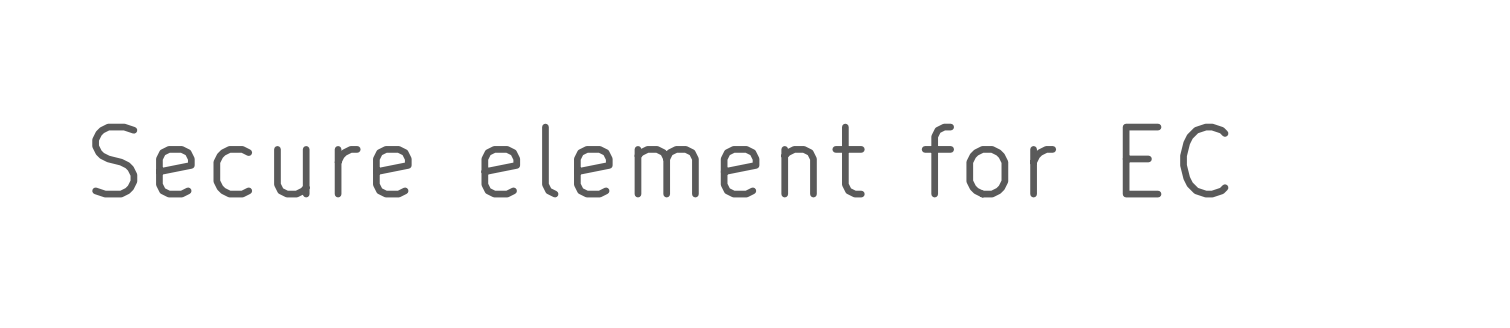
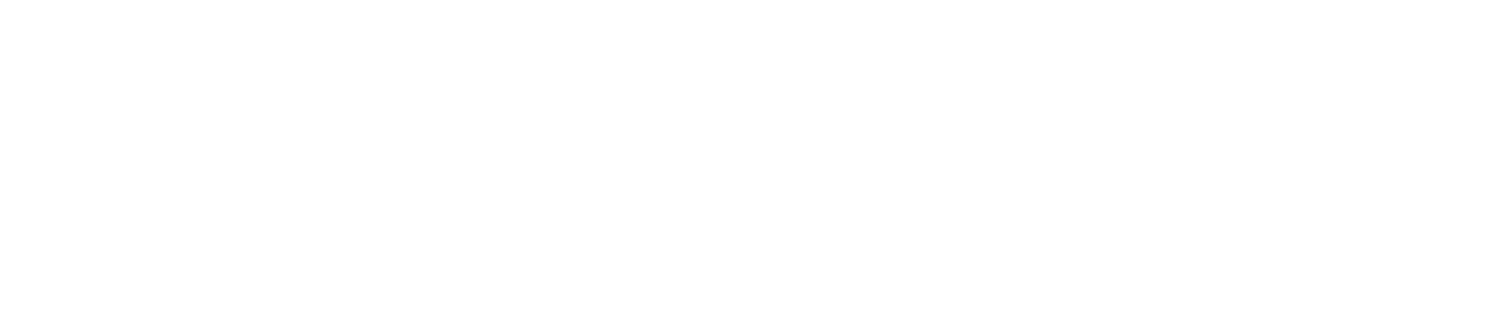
text: Secure element for EC (660, 160) -> none

